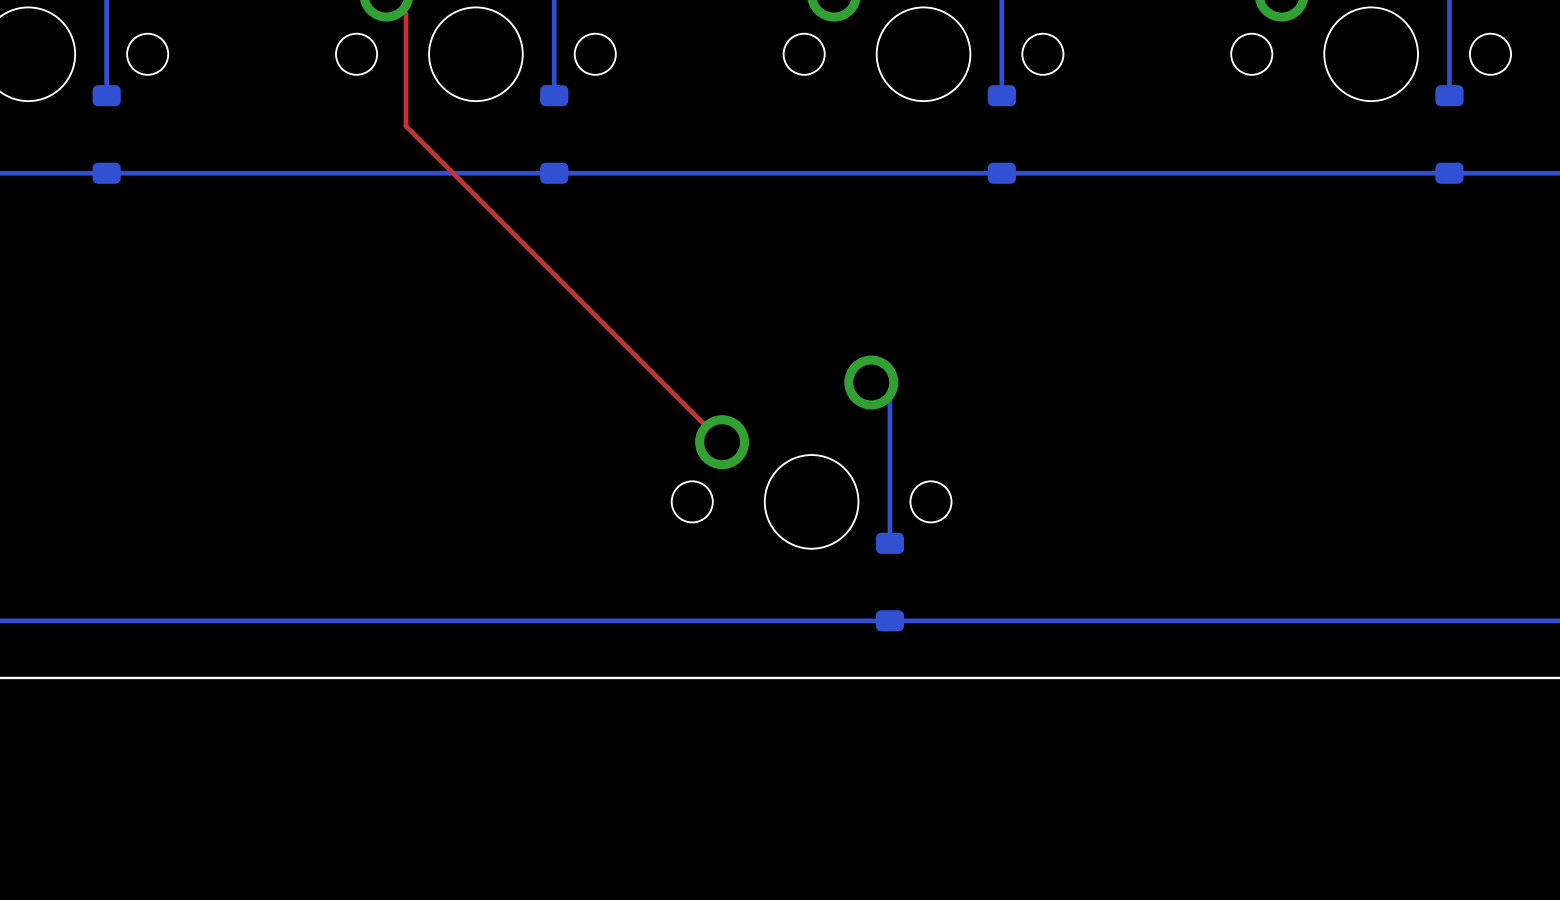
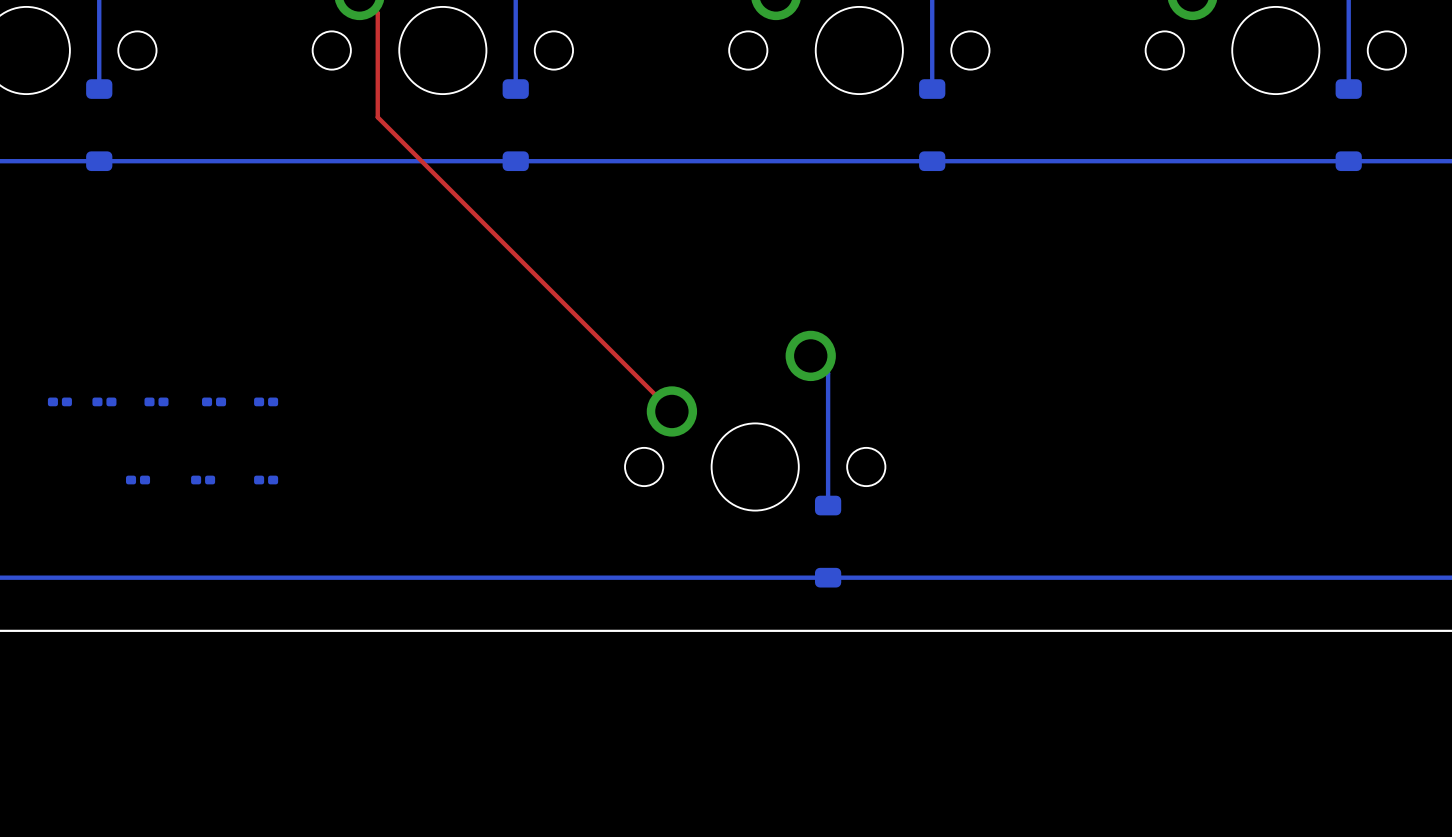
part: none -> (59, 401)
part: none -> (104, 401)
part: none -> (156, 401)
part: none -> (214, 401)
part: none -> (266, 401)
part: none -> (138, 480)
part: none -> (203, 480)
part: none -> (266, 480)

